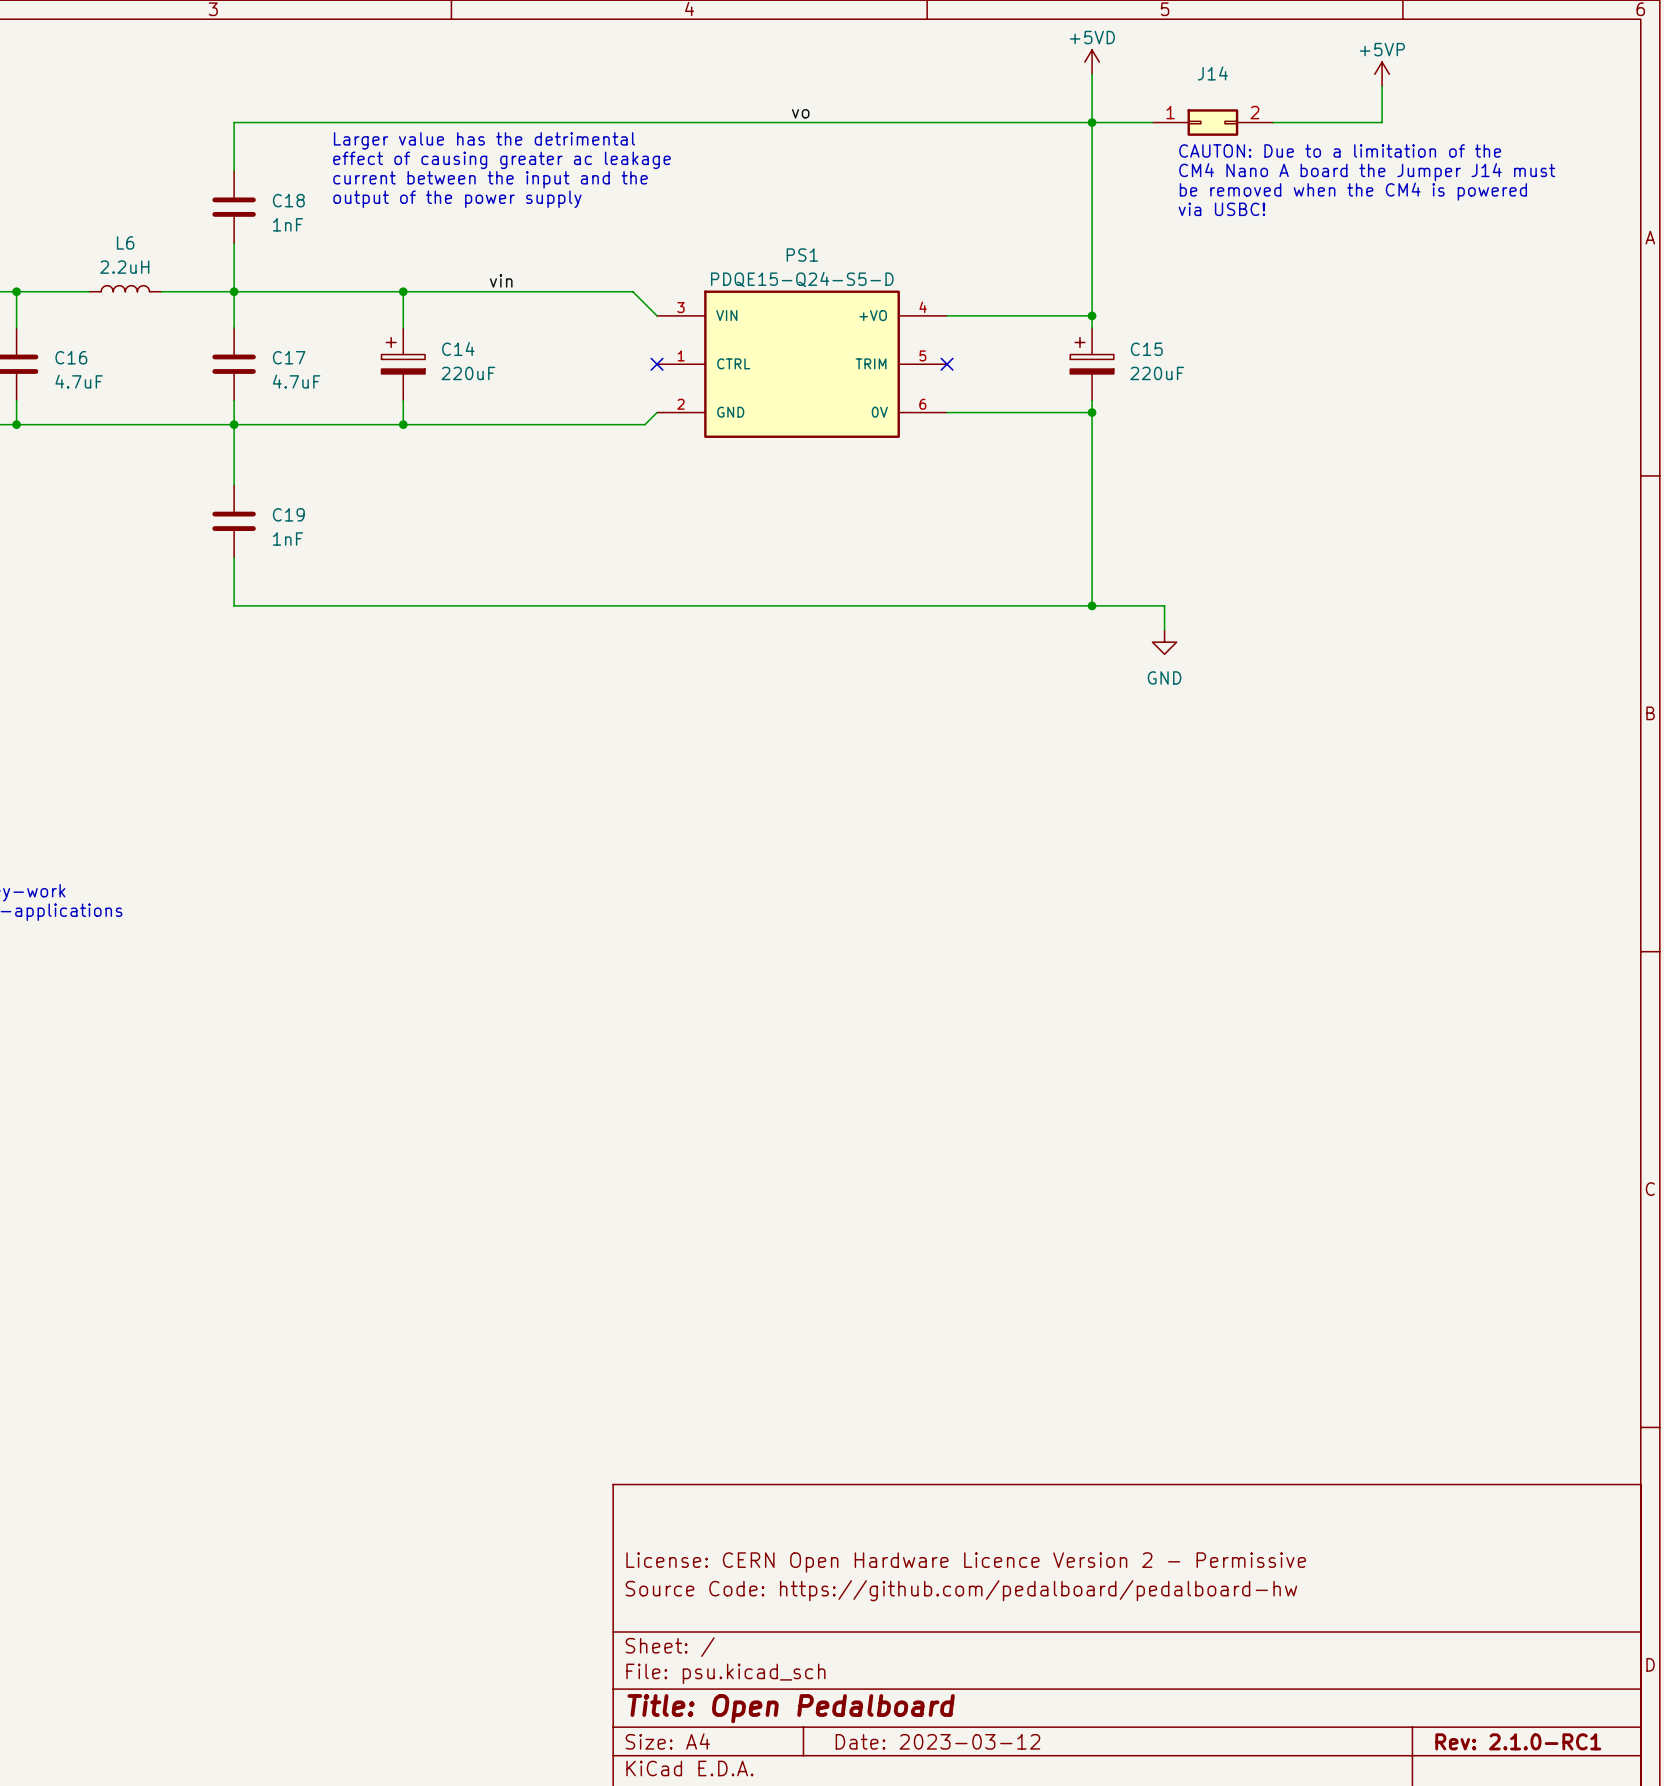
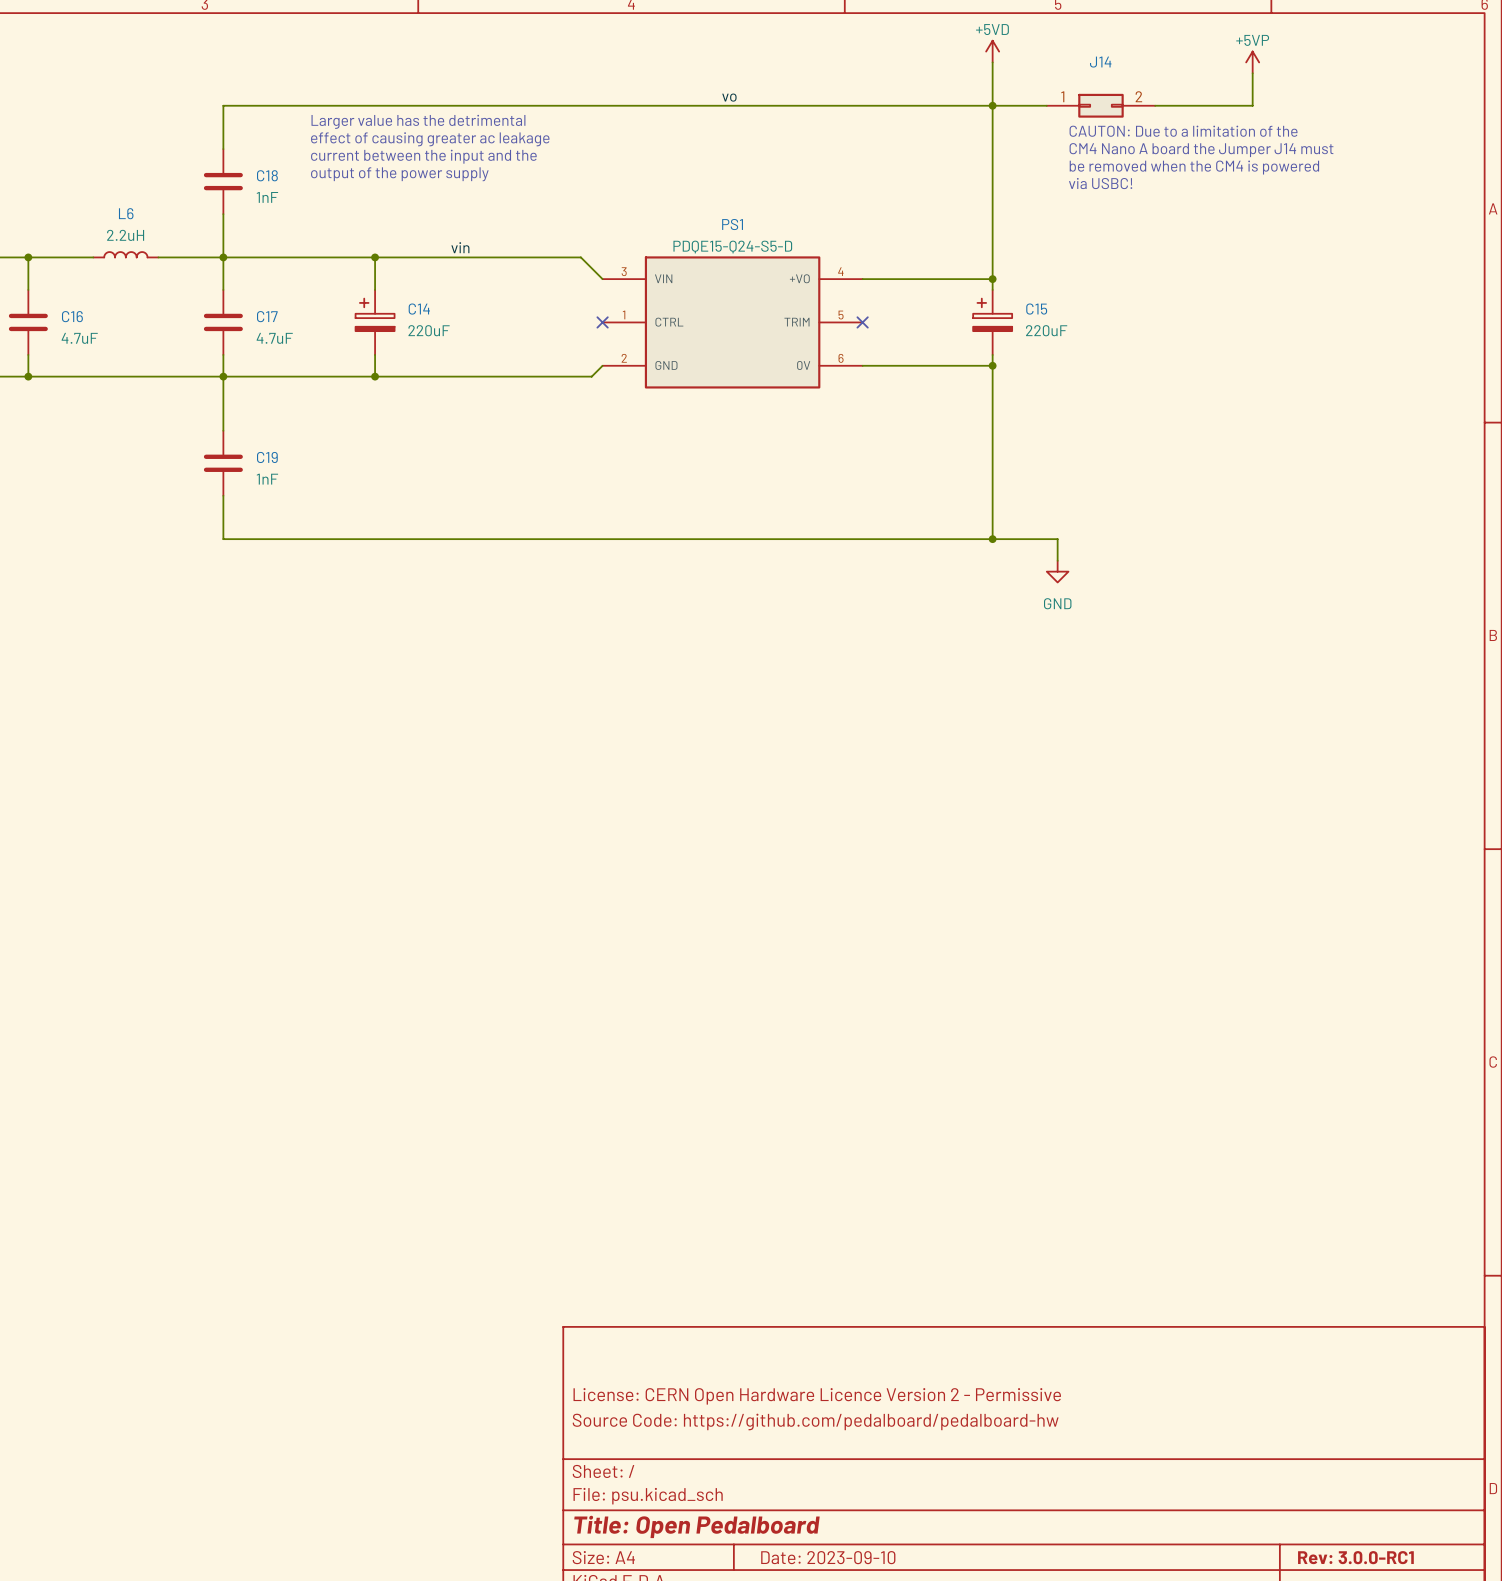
title block: Date: 2023-03-12 (937, 1741) -> Date: 2023-09-10 (828, 1557)
title block: Rev: 2.1.0-RC1 (1518, 1741) -> Rev: 3.0.0-RC1 (1355, 1557)

